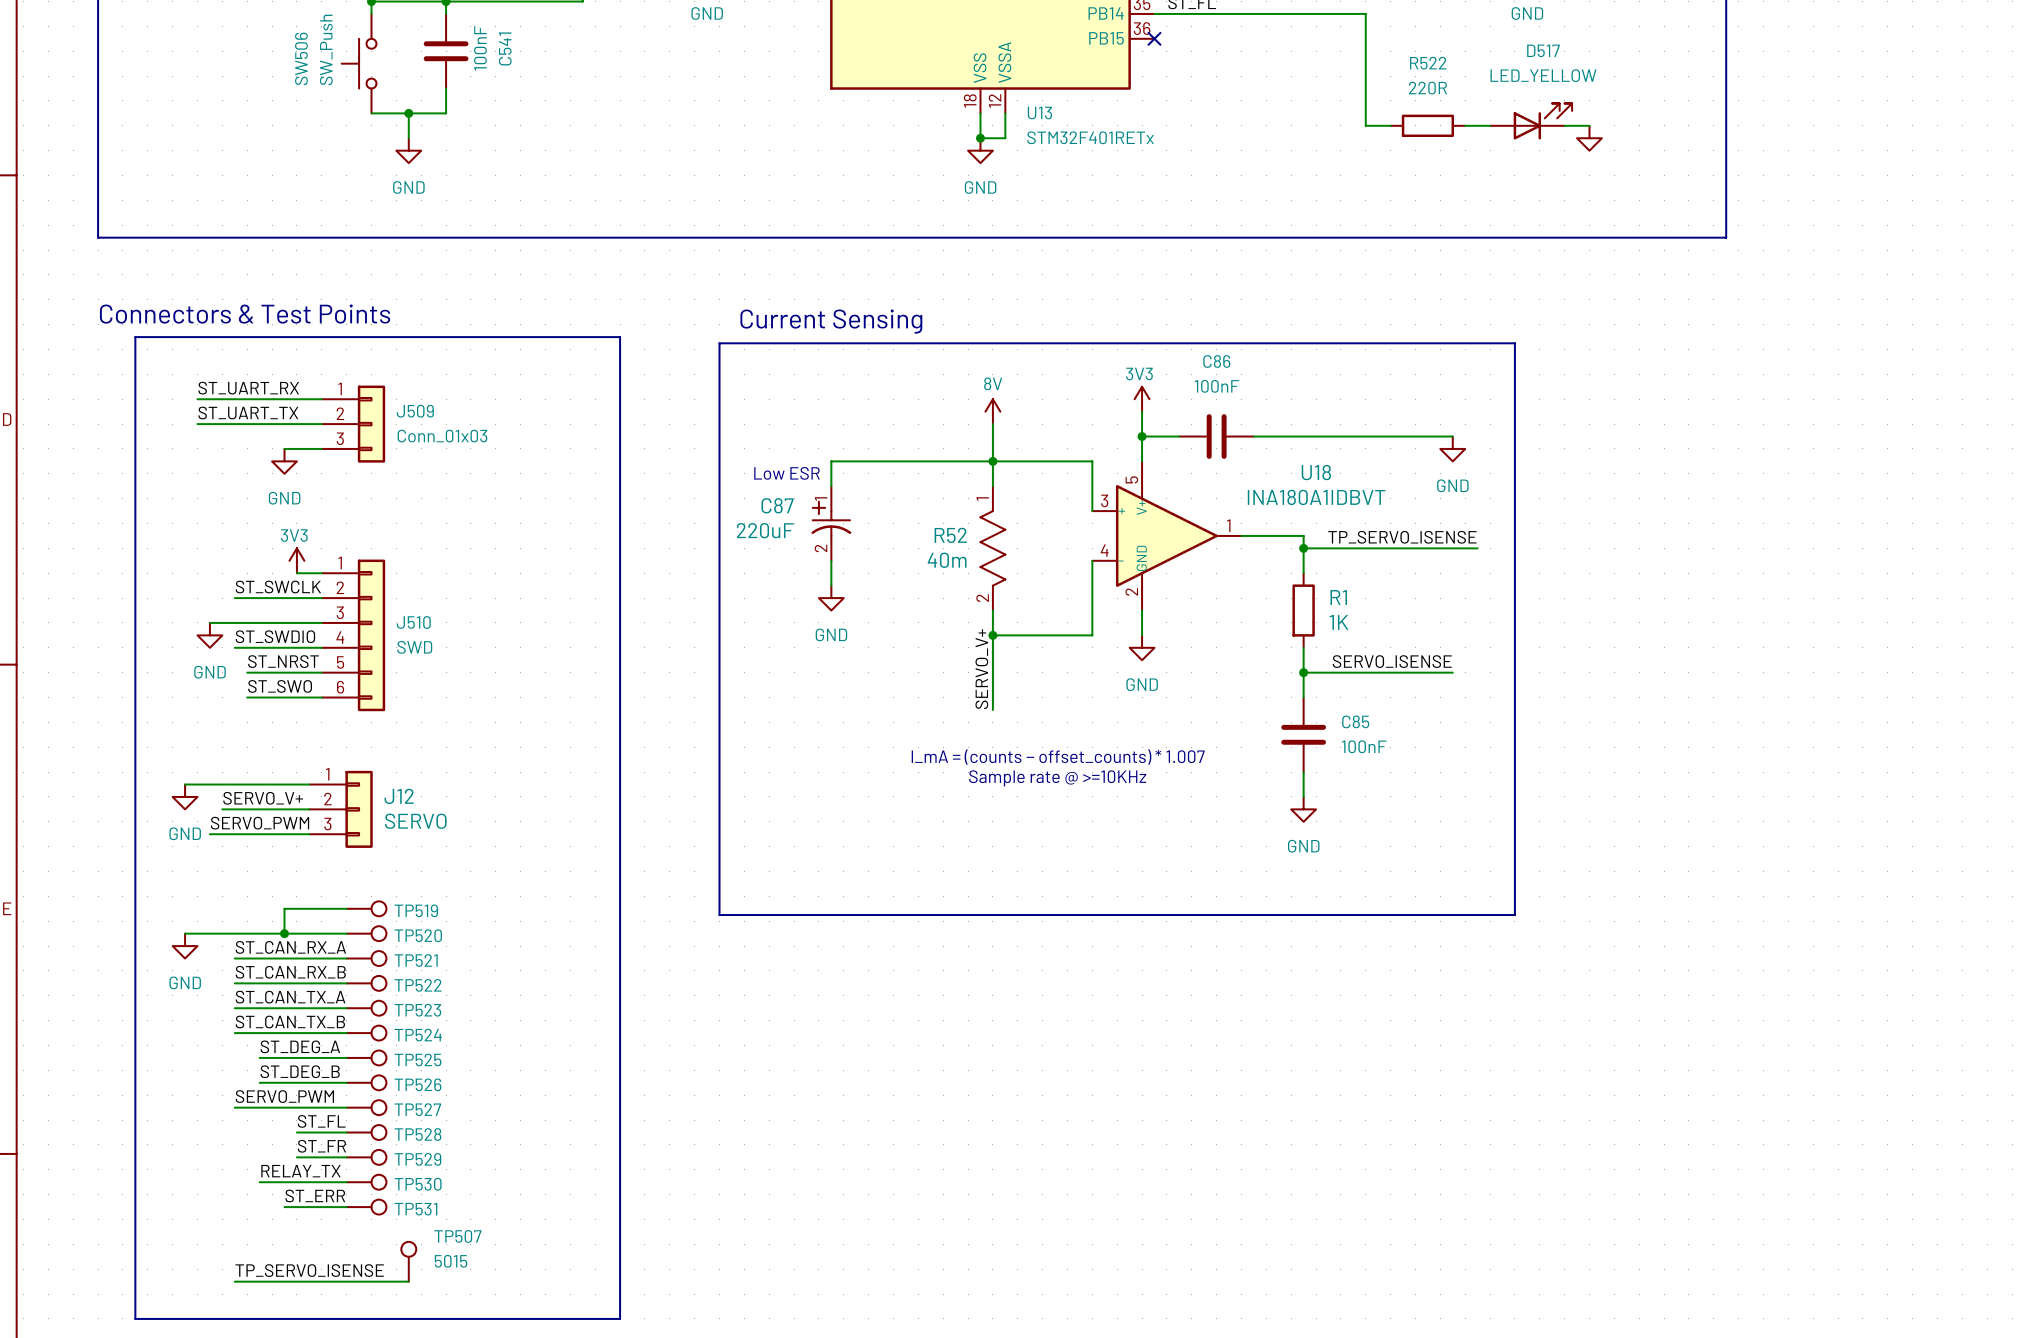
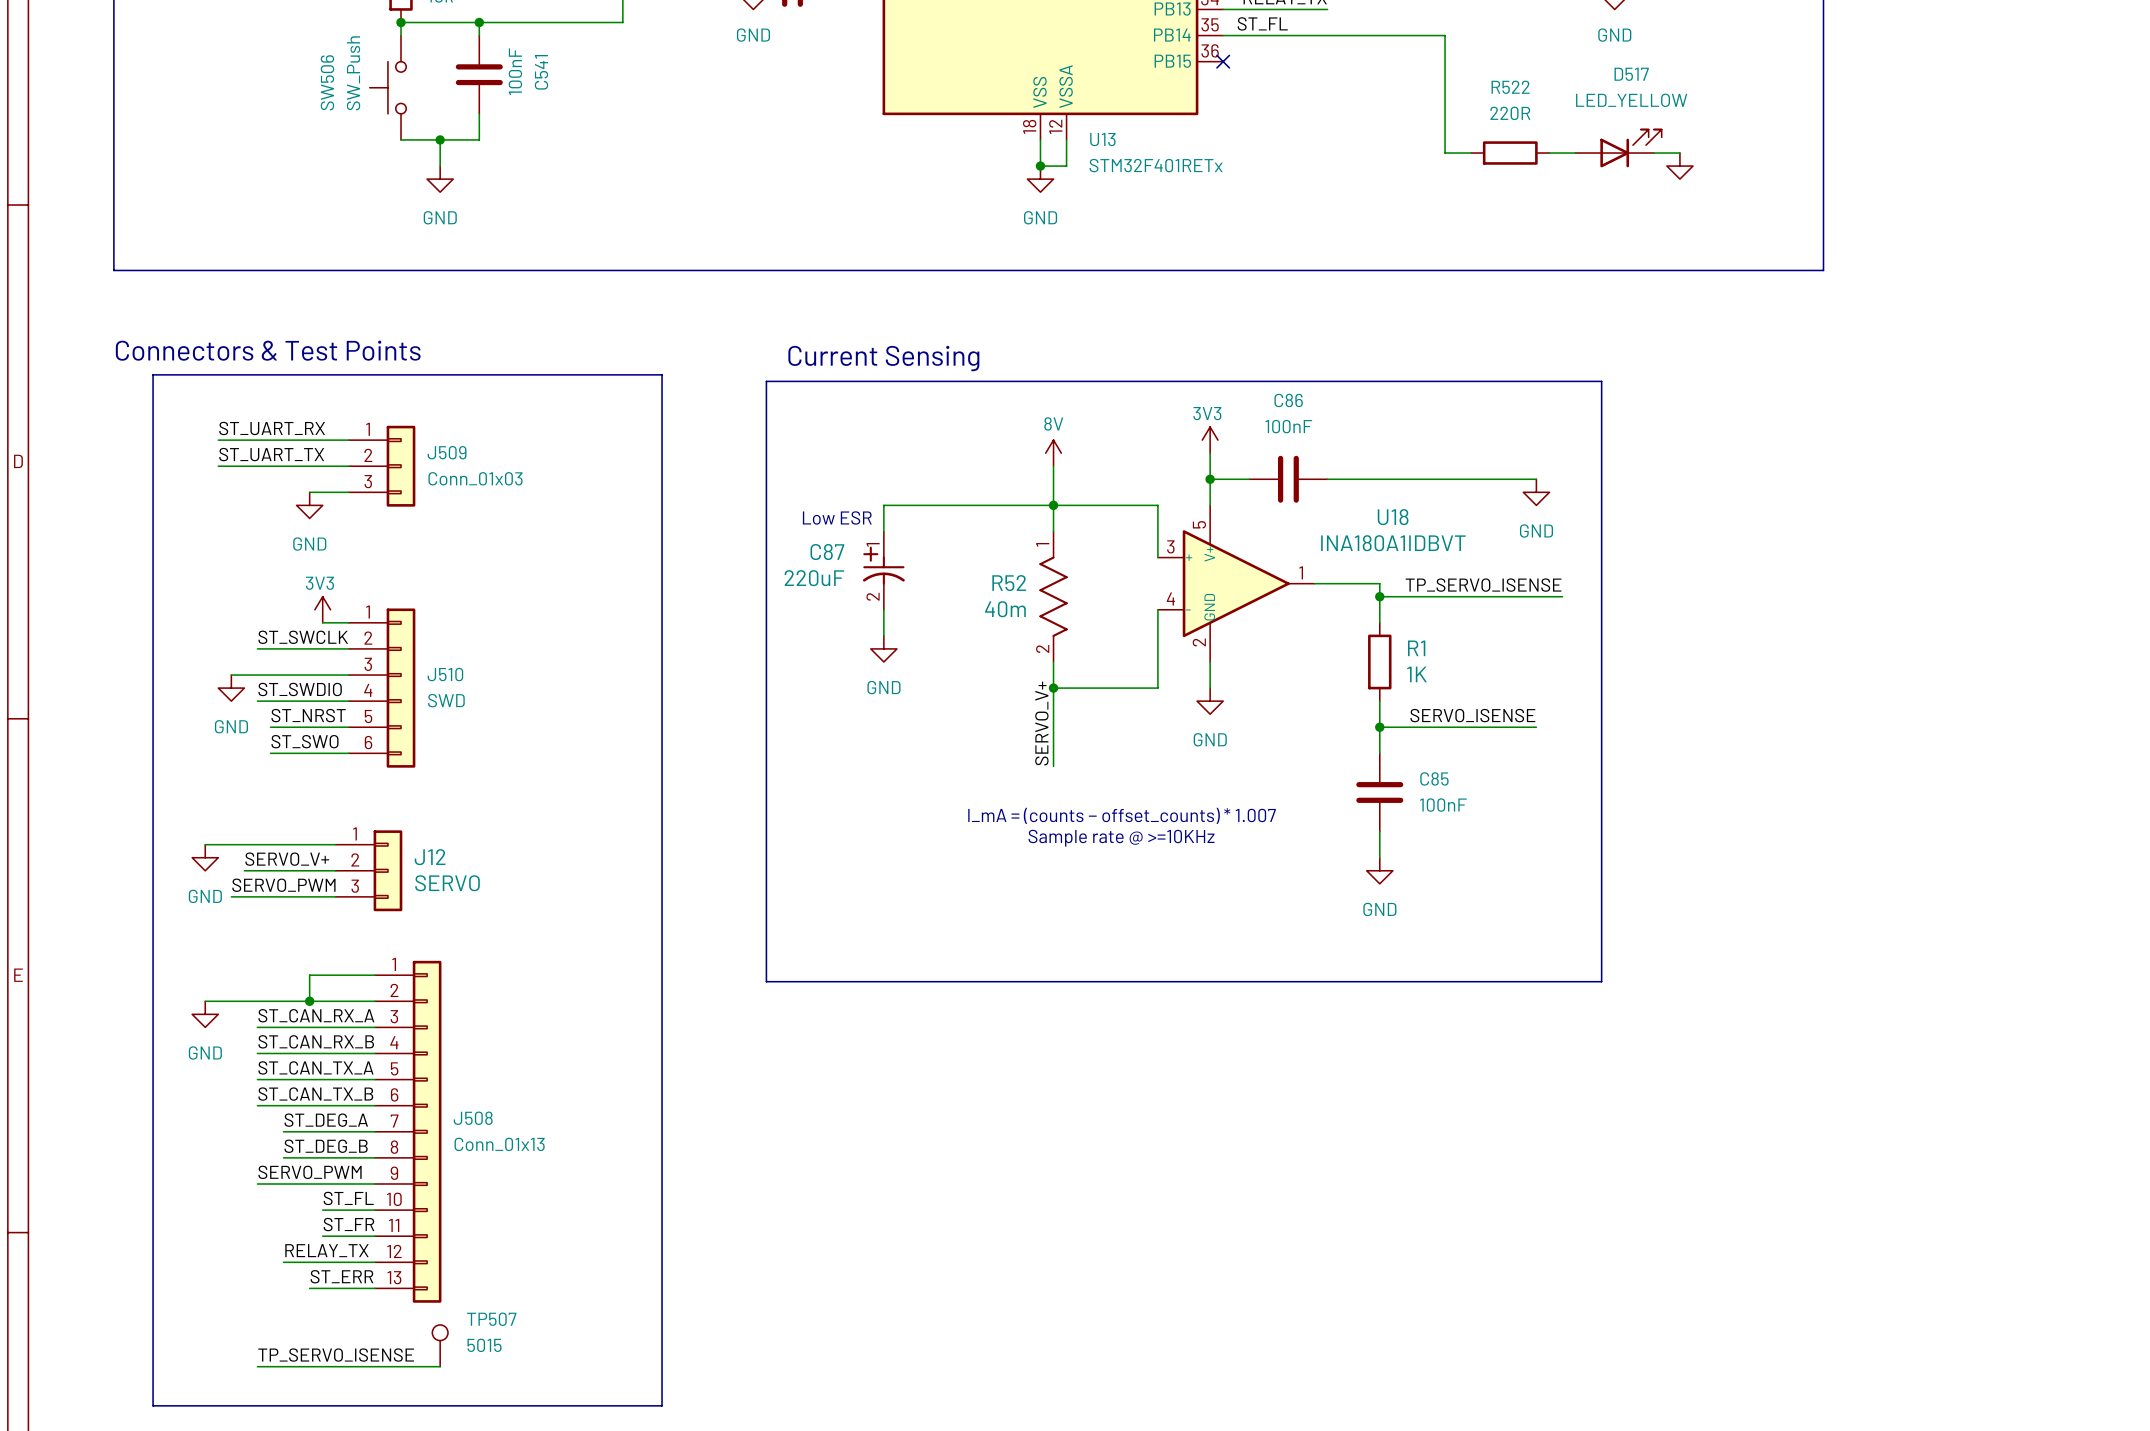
TP519: (366, 908) -> none
TP520: (366, 933) -> none
TP521: (366, 958) -> none
TP522: (366, 983) -> none
TP523: (366, 1008) -> none
TP524: (366, 1033) -> none
TP525: (366, 1057) -> none
J508: none -> Conn_01x13 (408, 1131)
TP526: (366, 1082) -> none
TP527: (366, 1107) -> none
TP528: (366, 1132) -> none
TP529: (366, 1157) -> none
TP530: (366, 1182) -> none
TP531: (366, 1207) -> none

